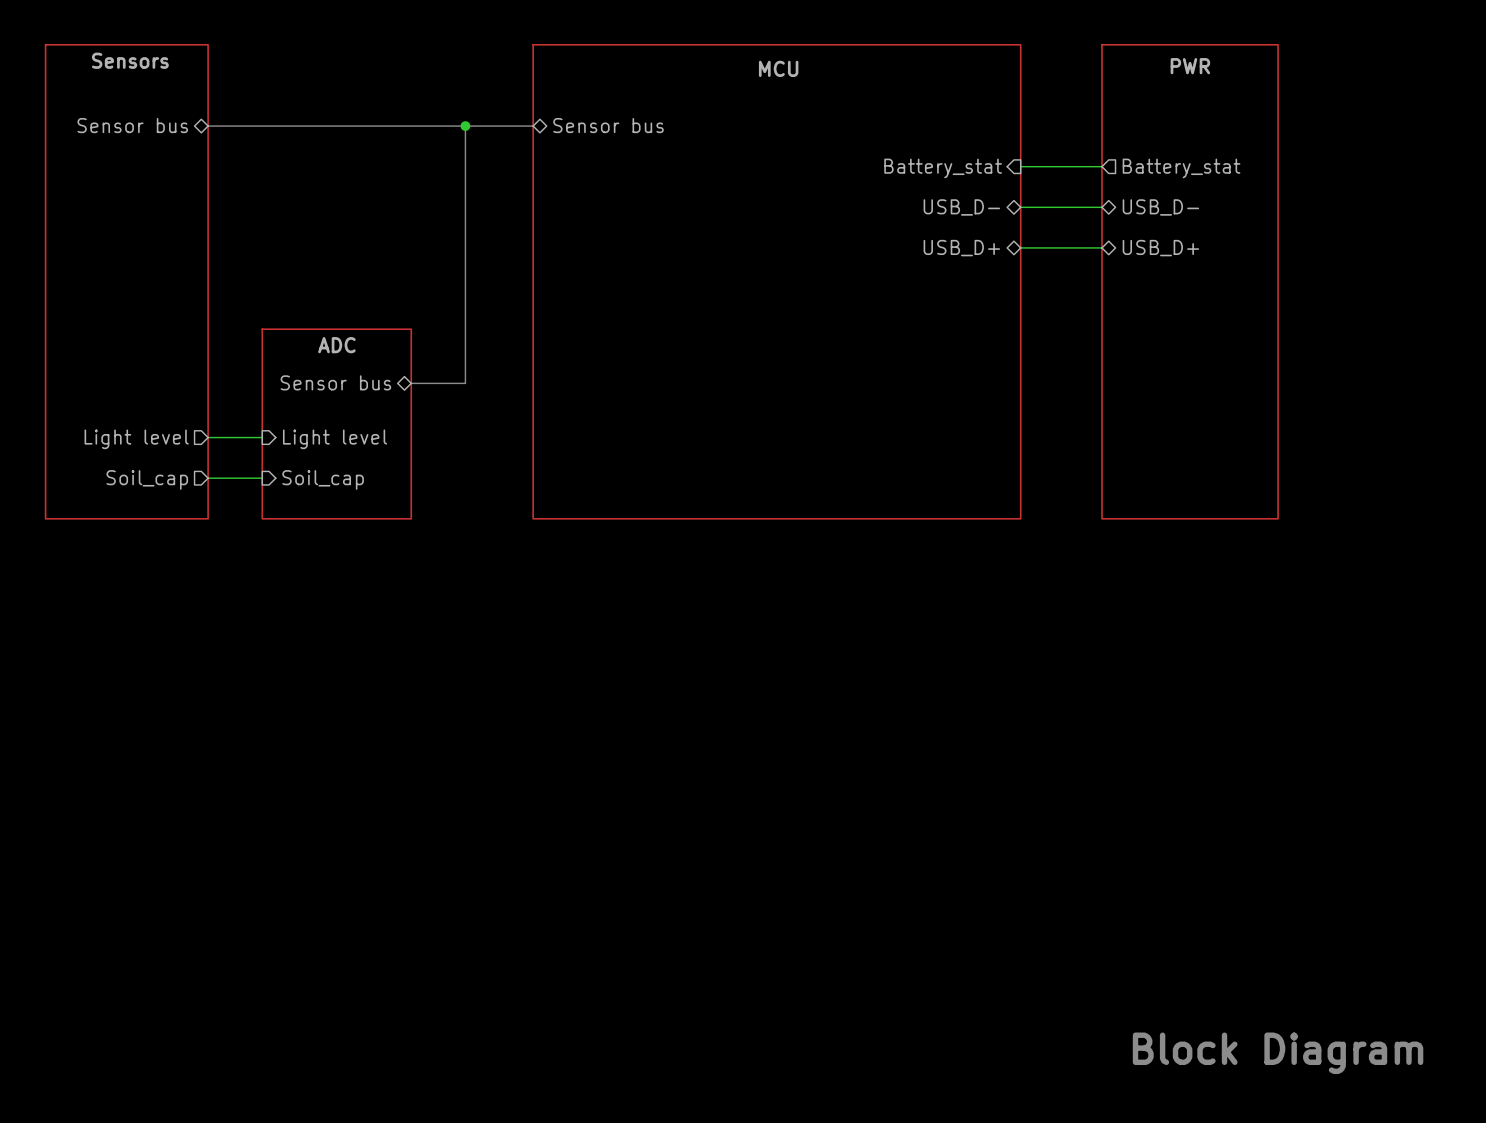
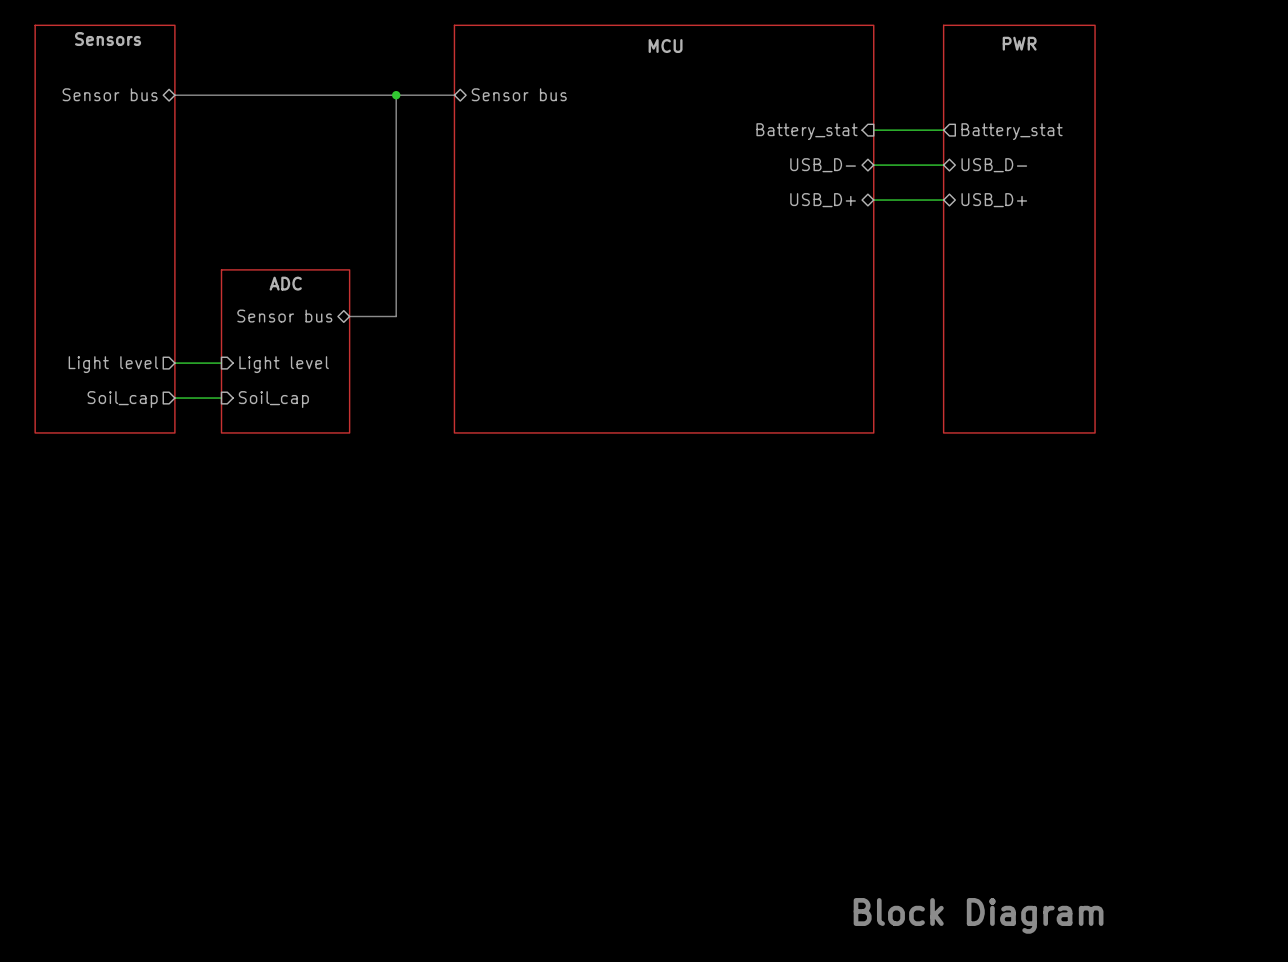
text position: Block Diagram (1278, 1053) -> Block Diagram (978, 915)

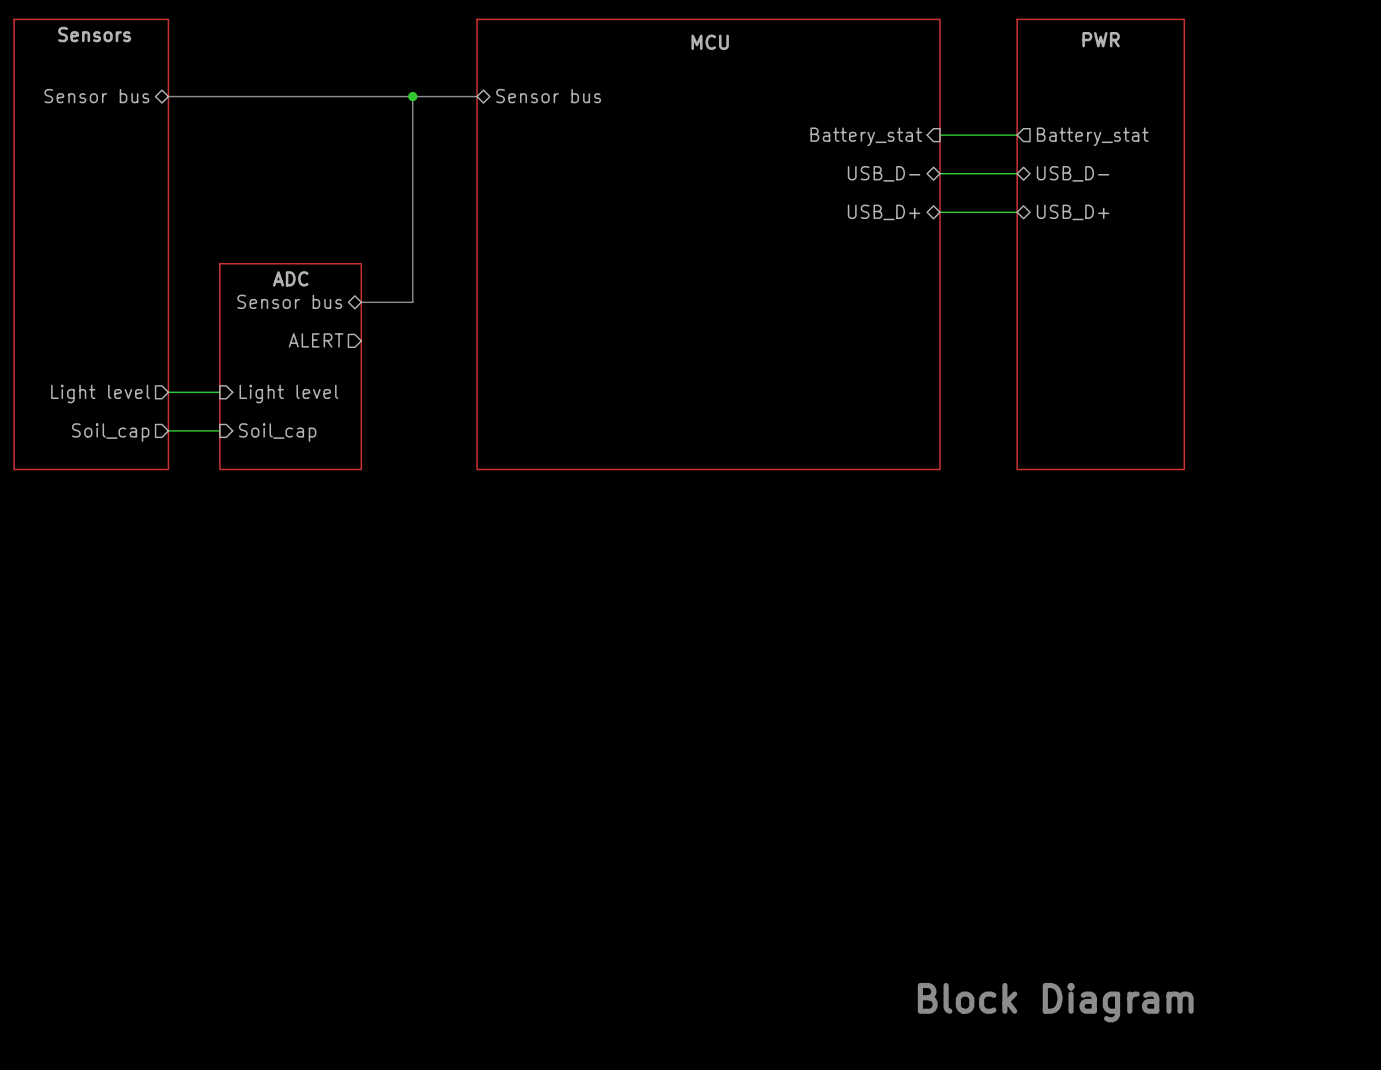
sheet pin: none -> Sensor bus (289, 301)
bus: (396, 281) (396, 316) (349, 316) -> (412, 302) (361, 302)
sheet pin shape: bidirectional (284, 316) -> output (316, 340)
sheet pin: Sensor bus (284, 316) -> ALERT (316, 340)
sheet ADC: none -> (290, 366)
sheet ADC: (285, 351) -> none

